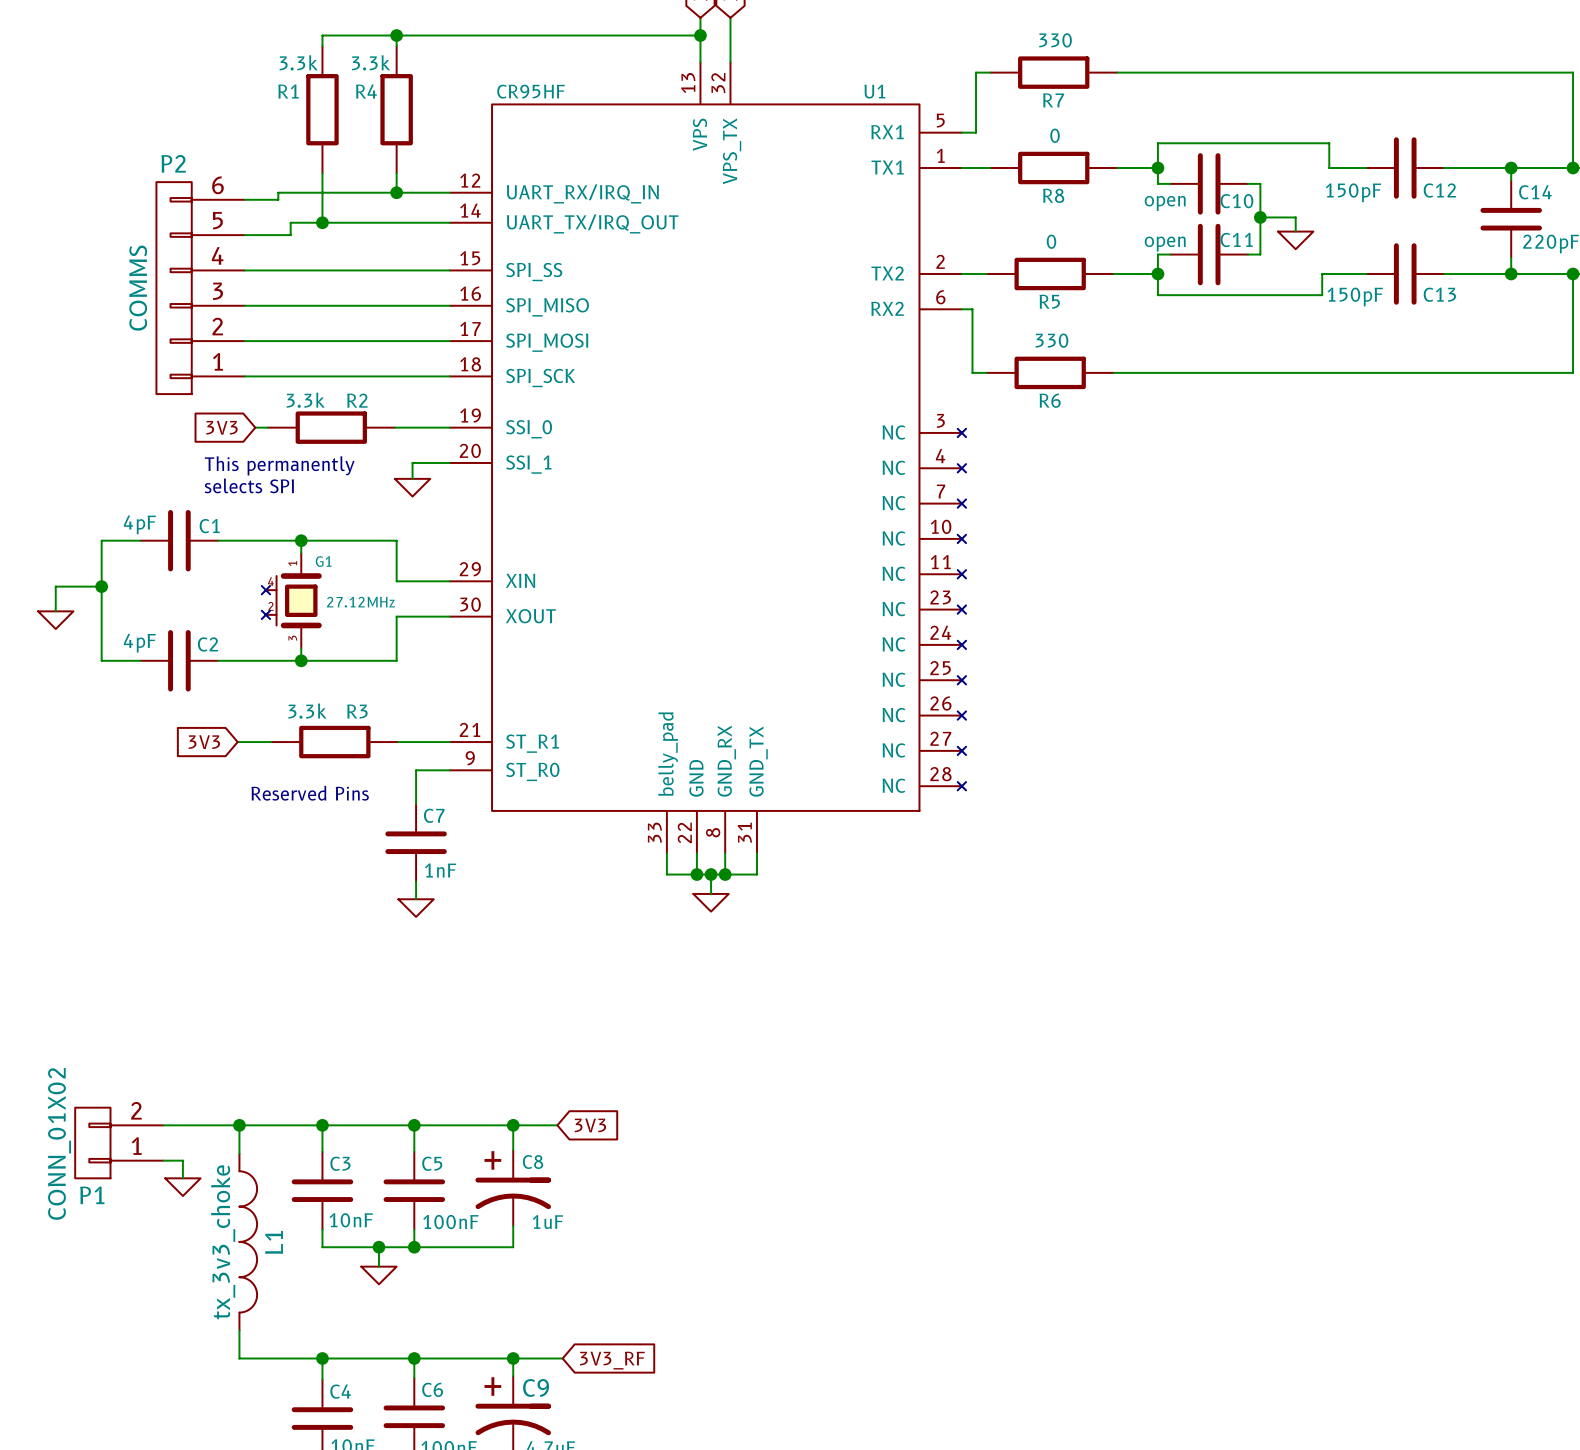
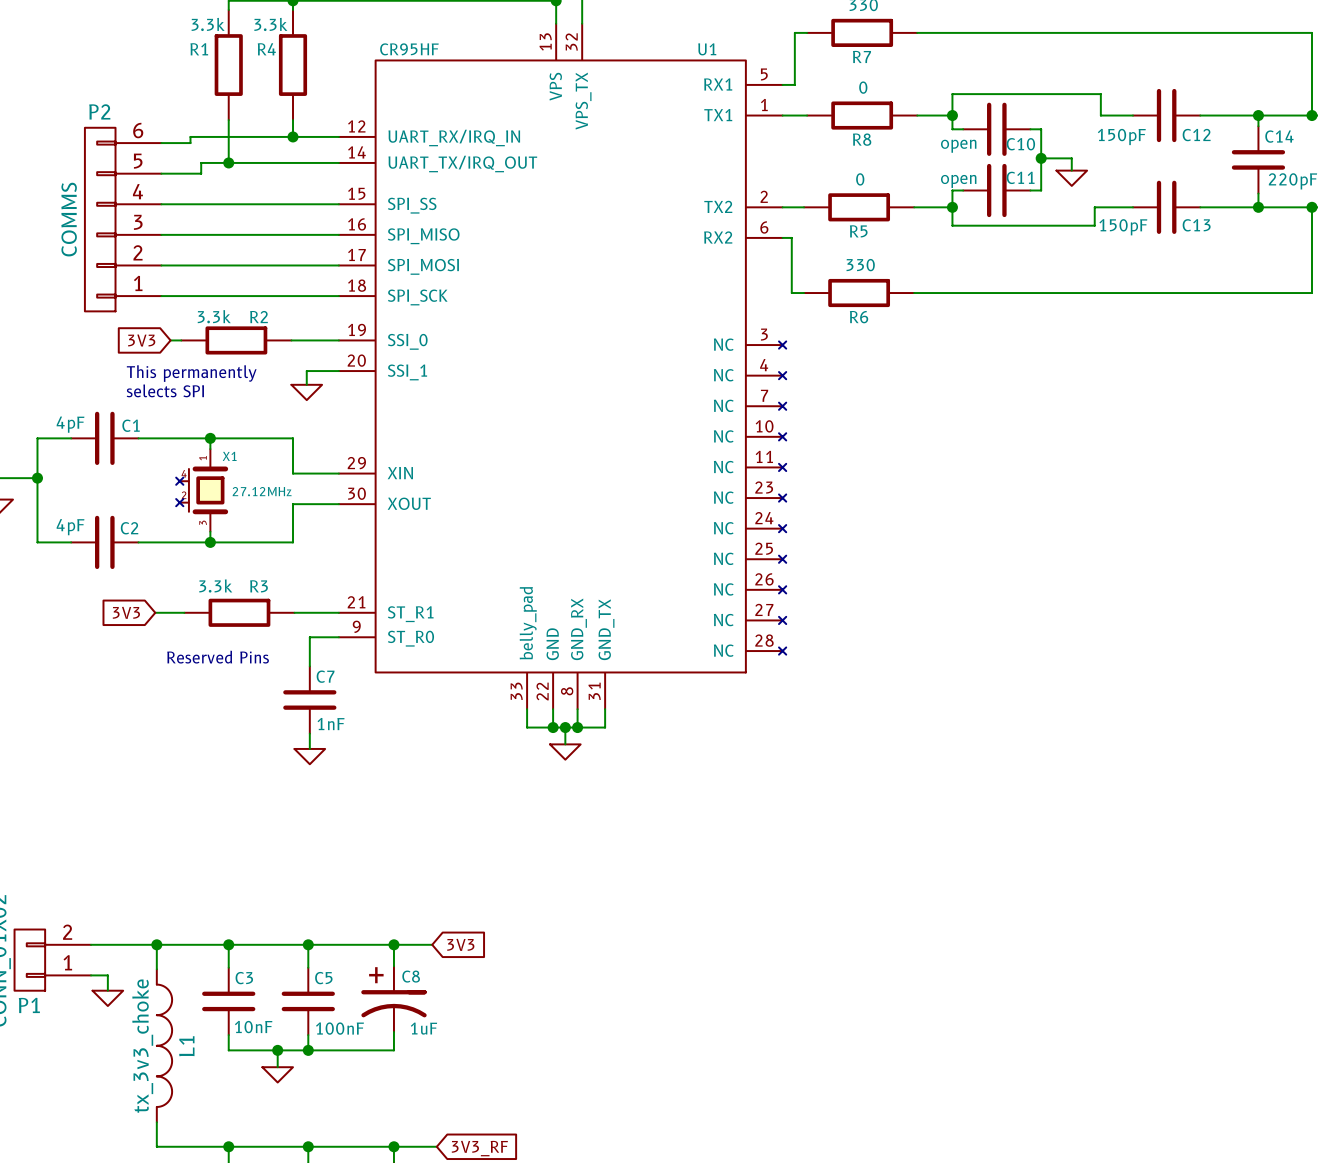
G1 name: G1 (323, 561) -> X1 (229, 456)

